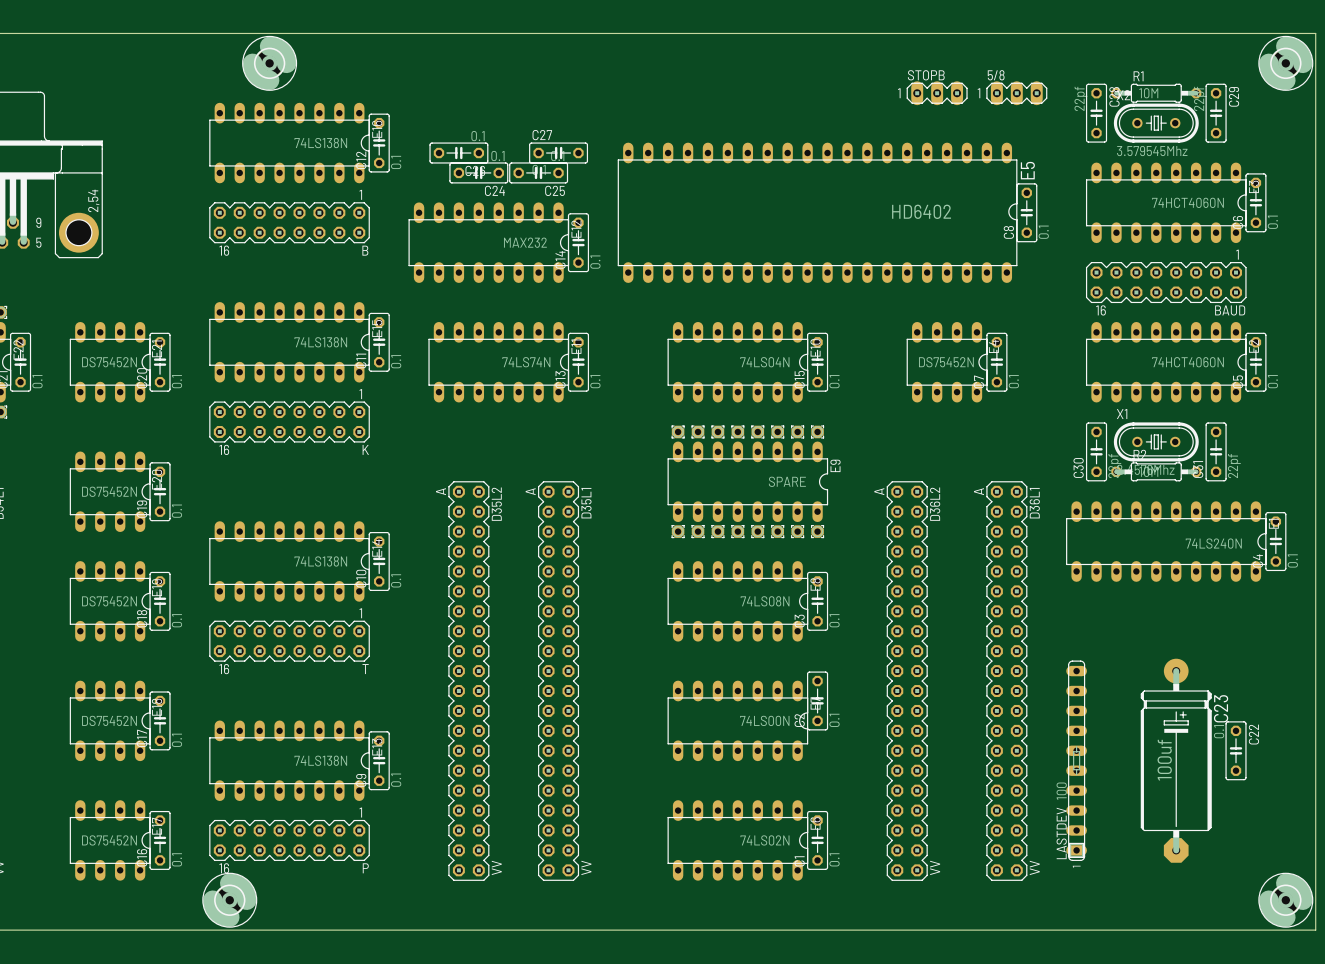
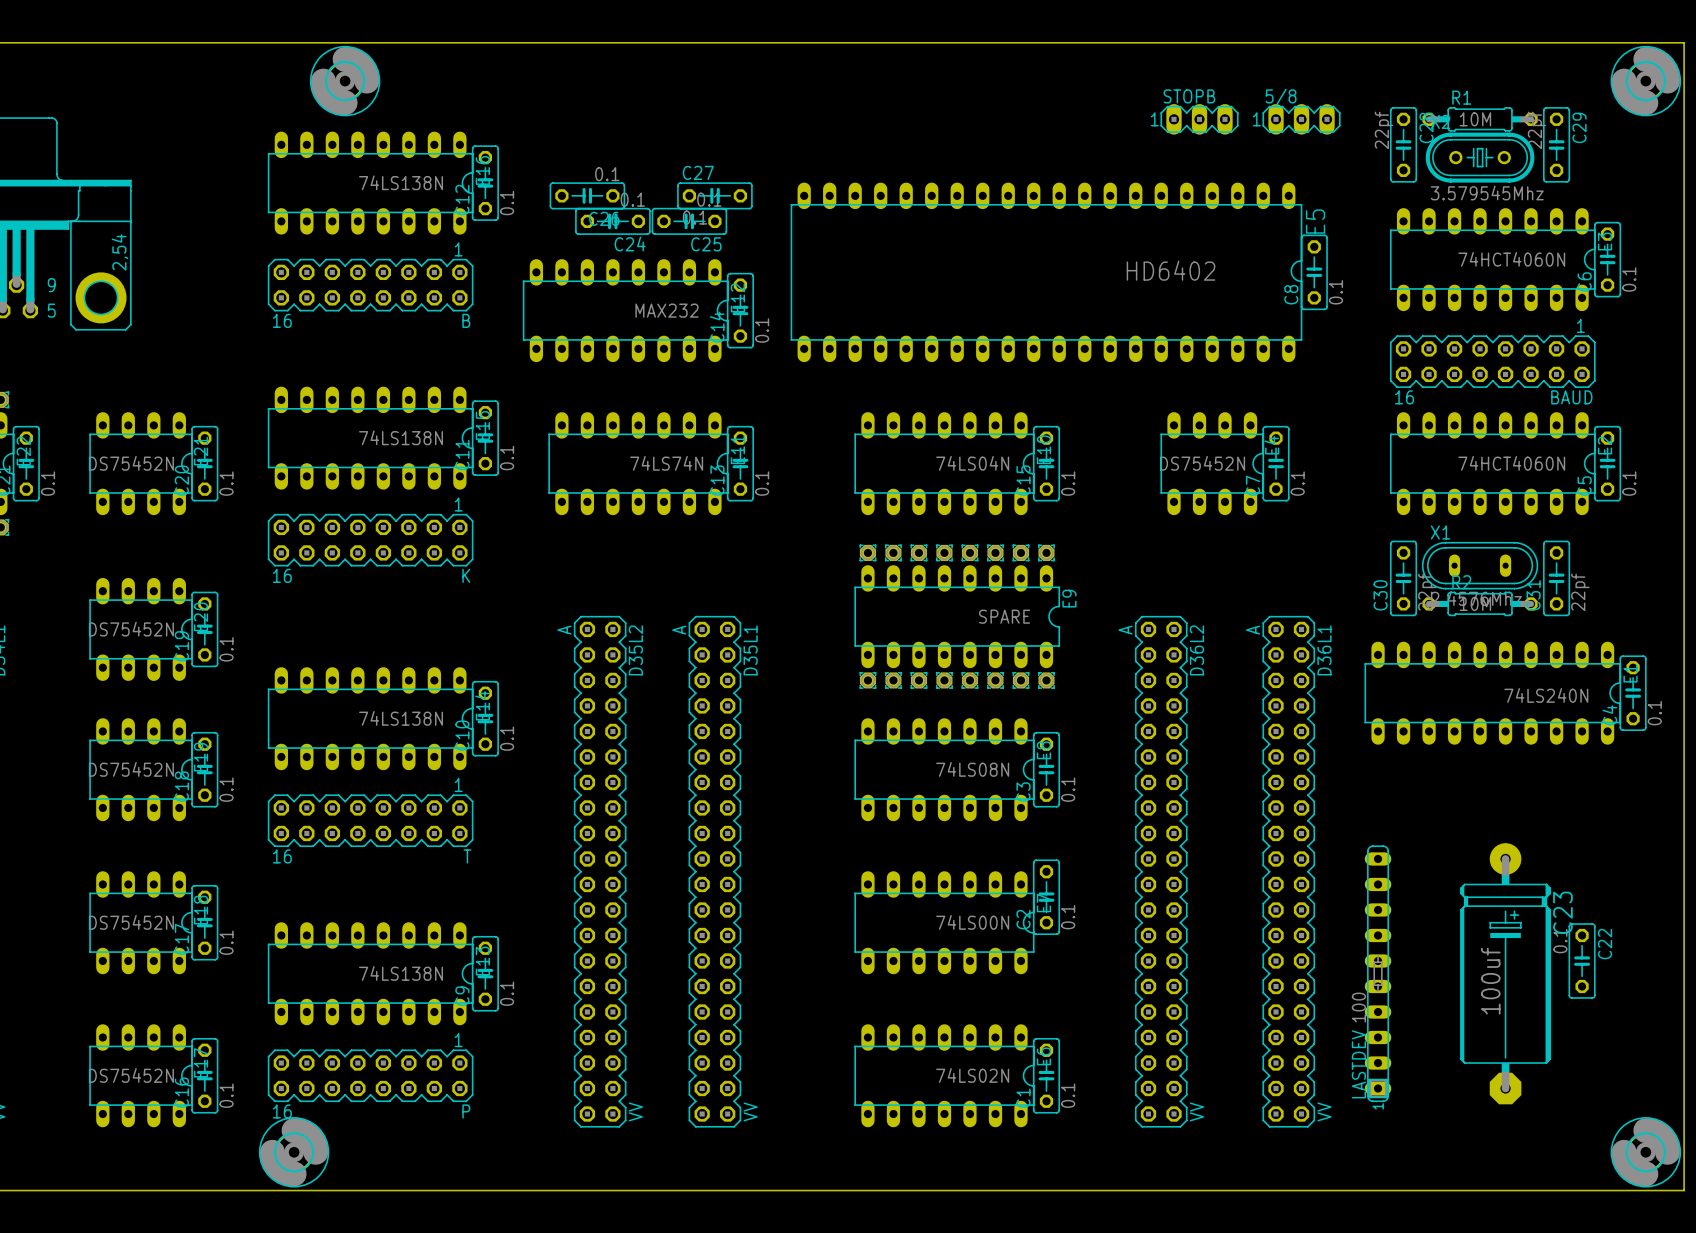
X1 footprint: [1113, 422, 1199, 462] -> [1421, 541, 1539, 590]

